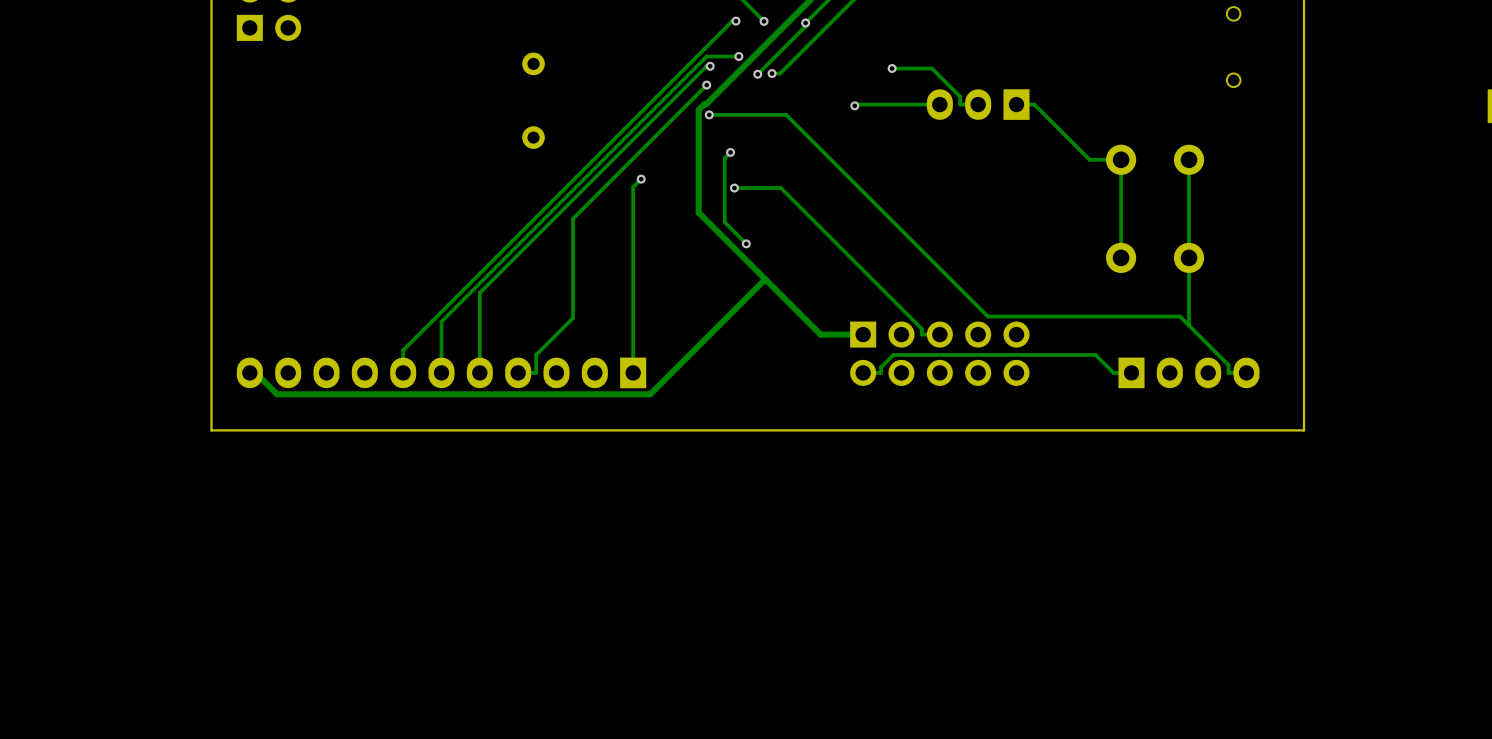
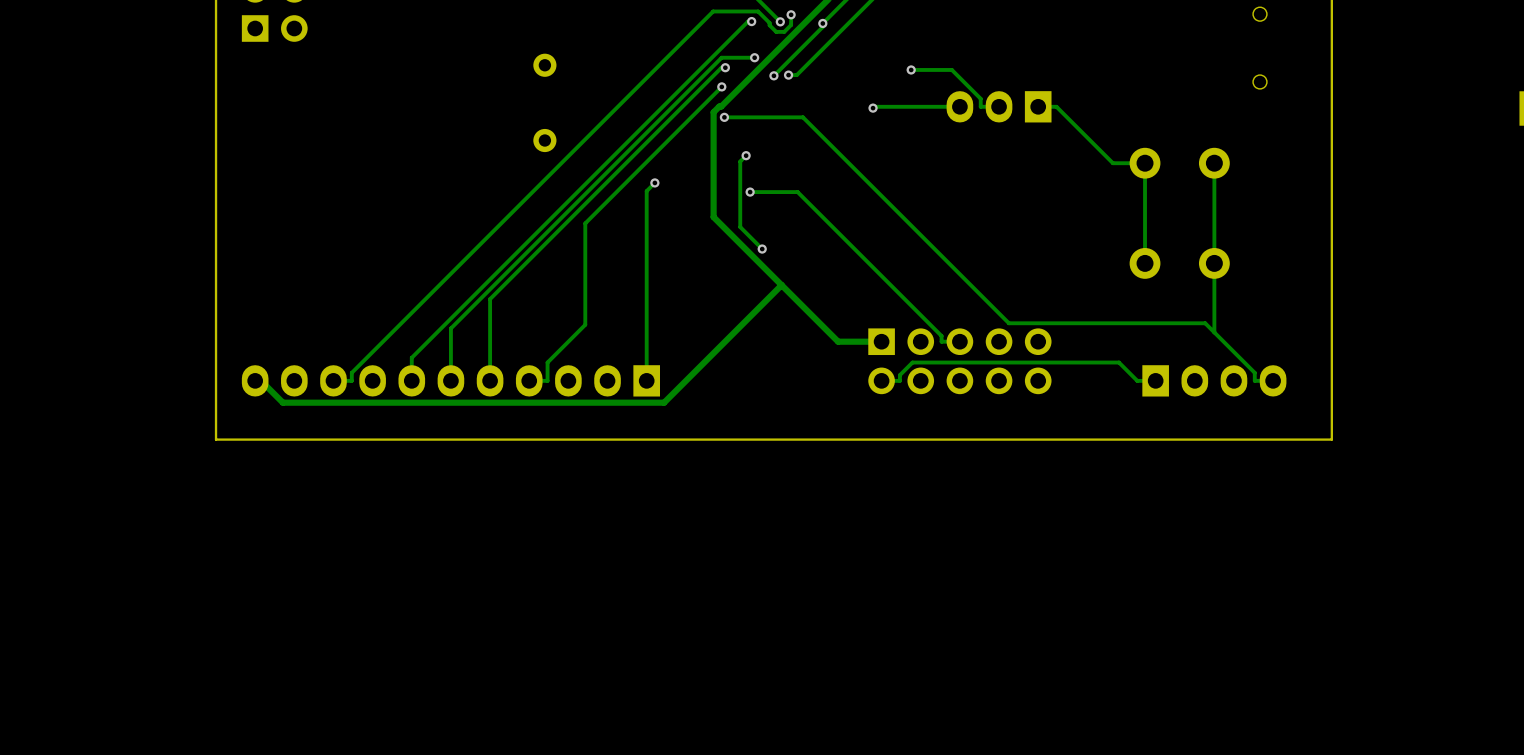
track: none -> (791, 14) (791, 25) (784, 31) (776, 31) (758, 11) (713, 11) (351, 372) (351, 380) (333, 380)
via: none -> (791, 14)

